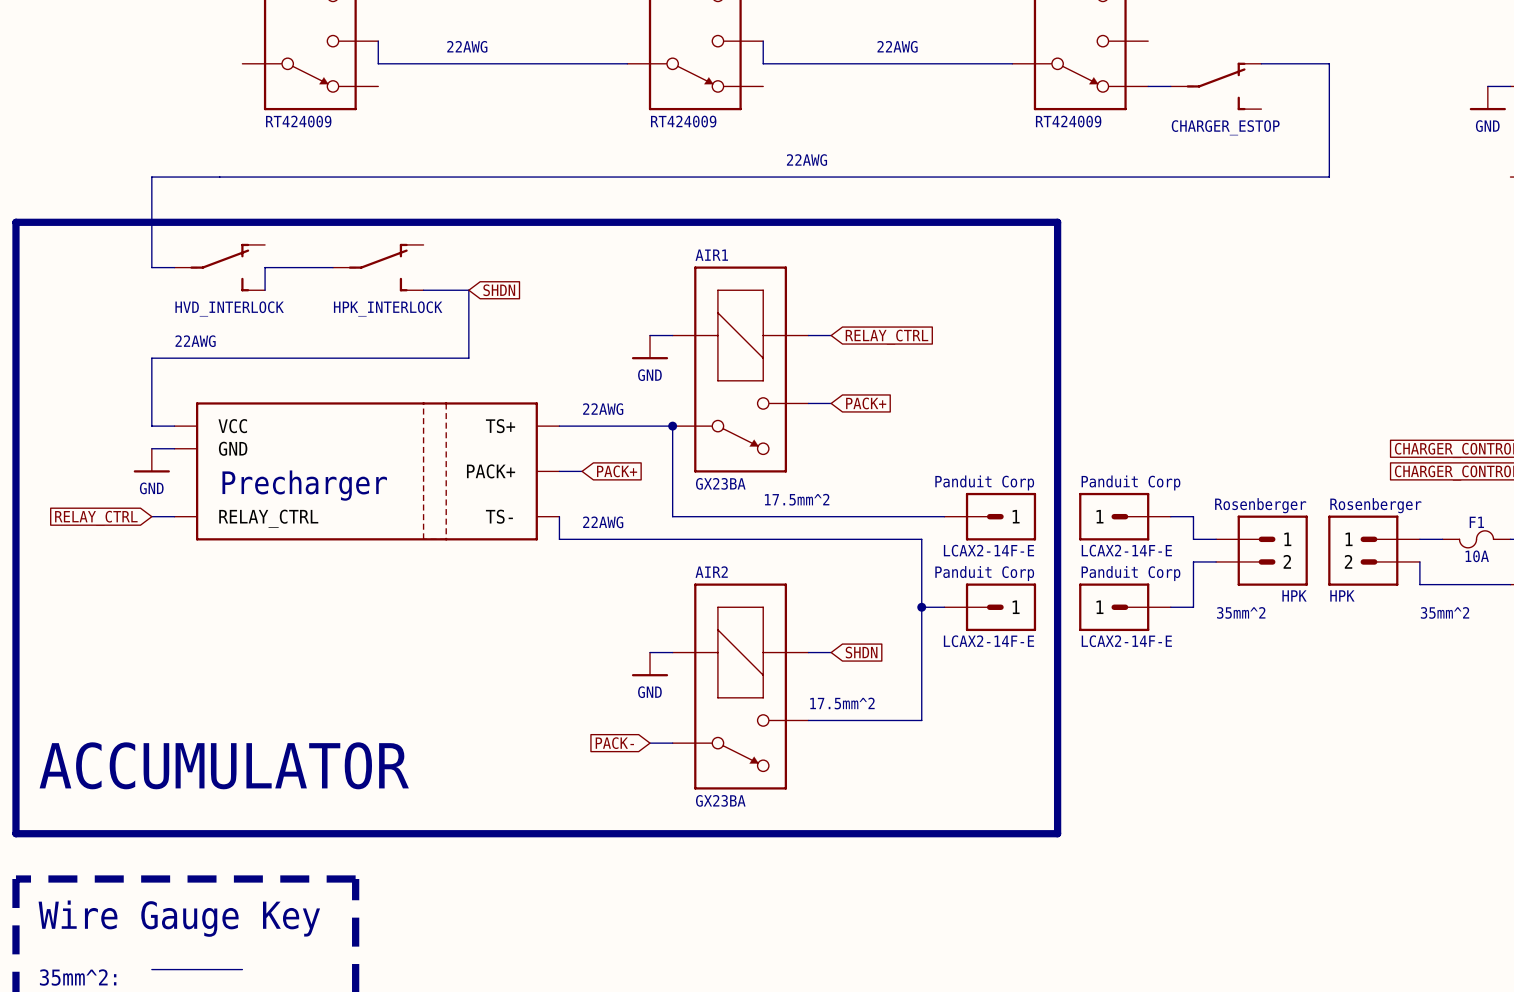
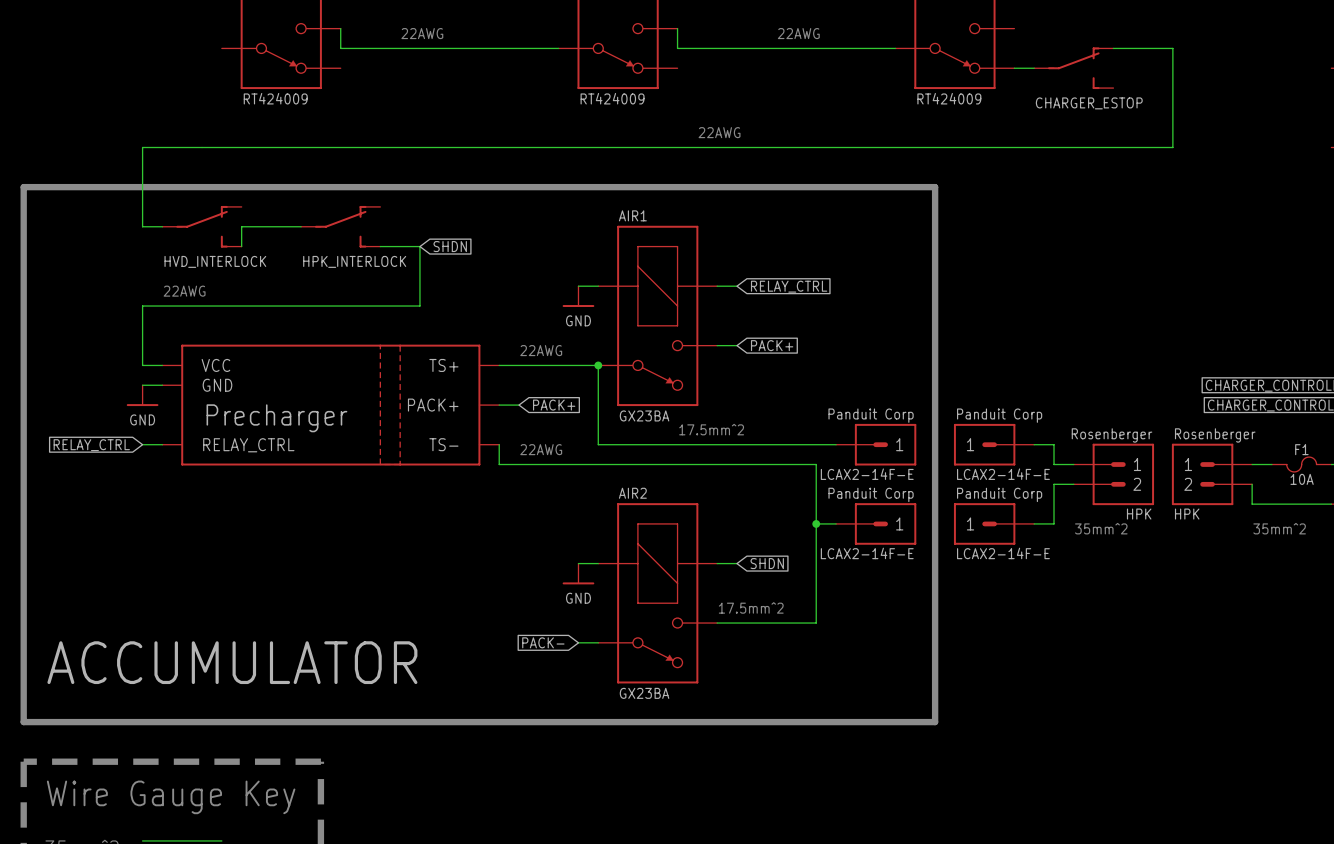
wire: (1487, 86) (1510, 86) -> none
power symbol: GND (1487, 98) -> none

